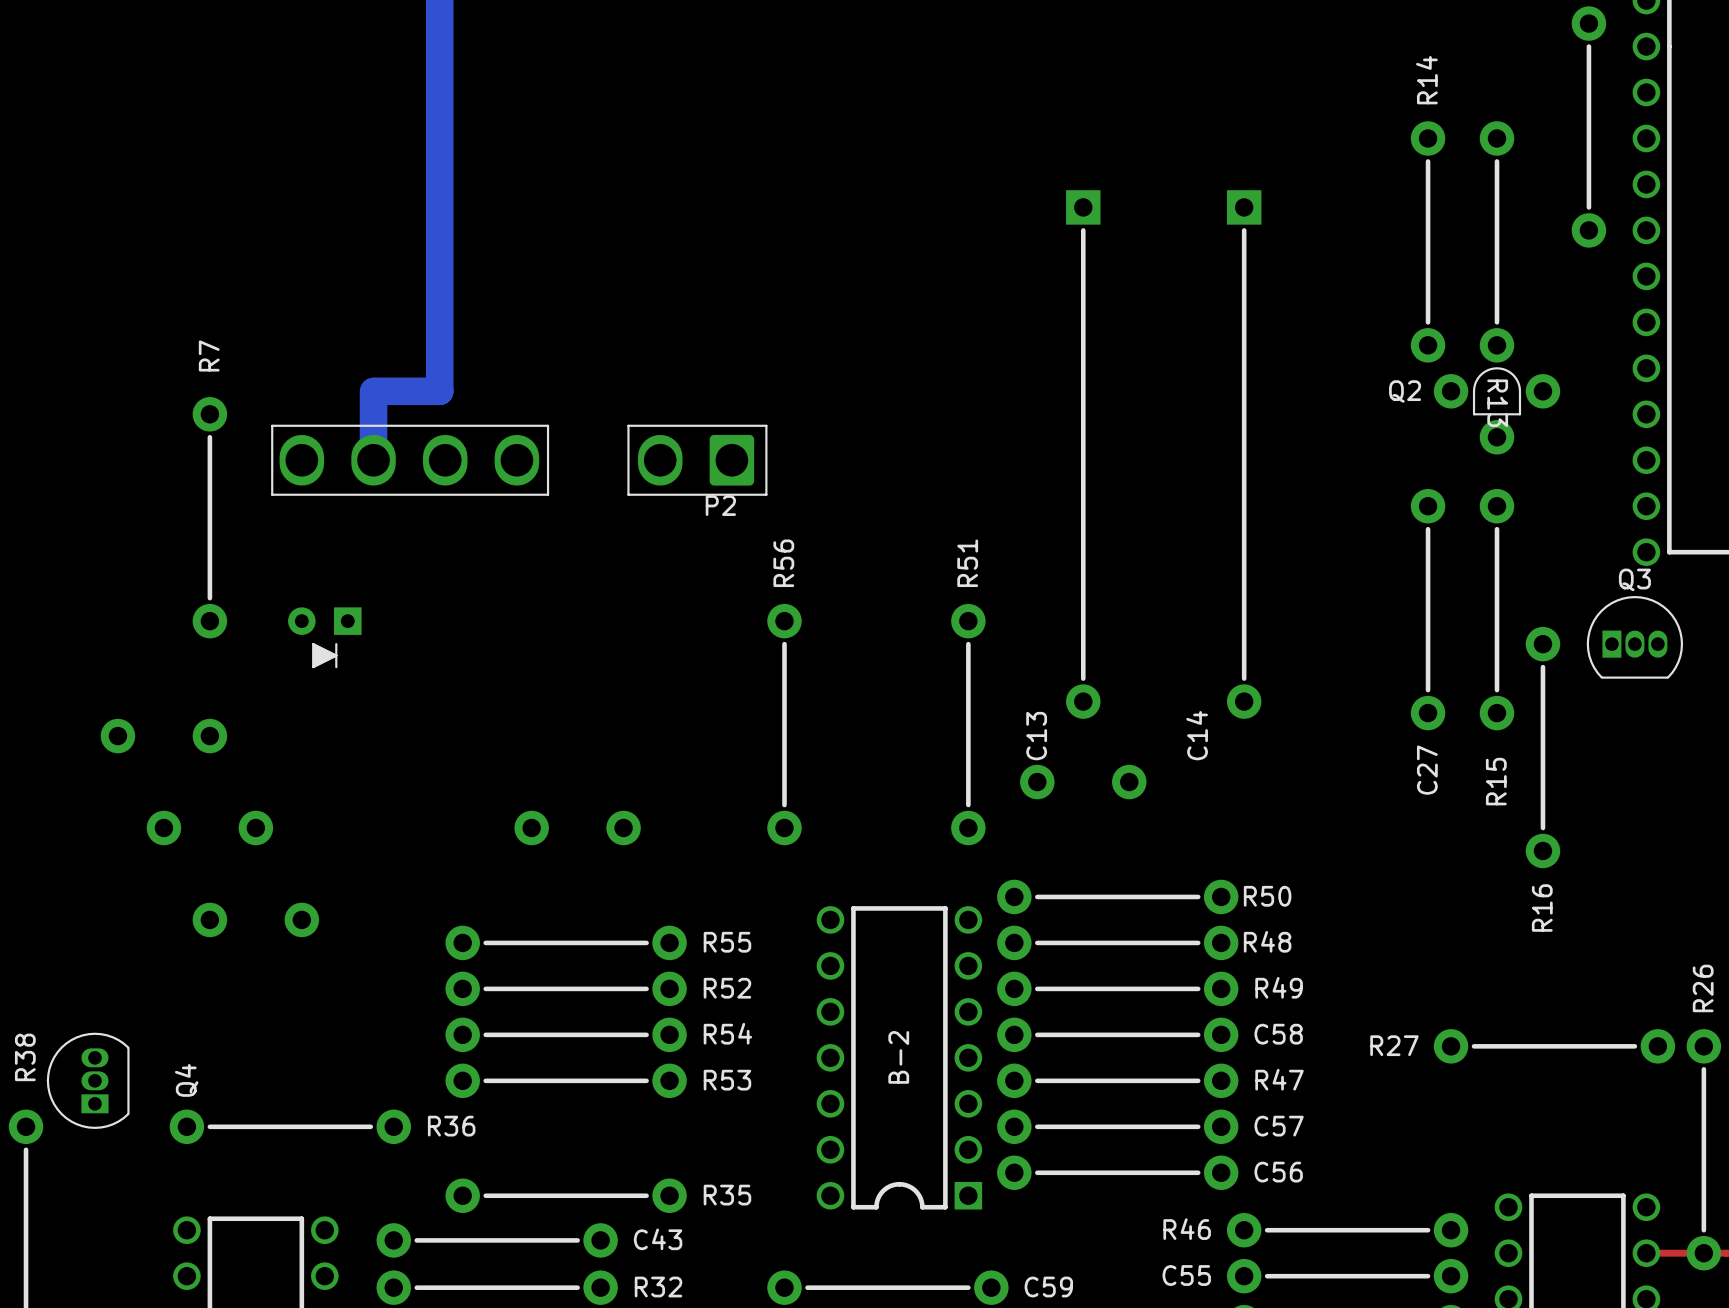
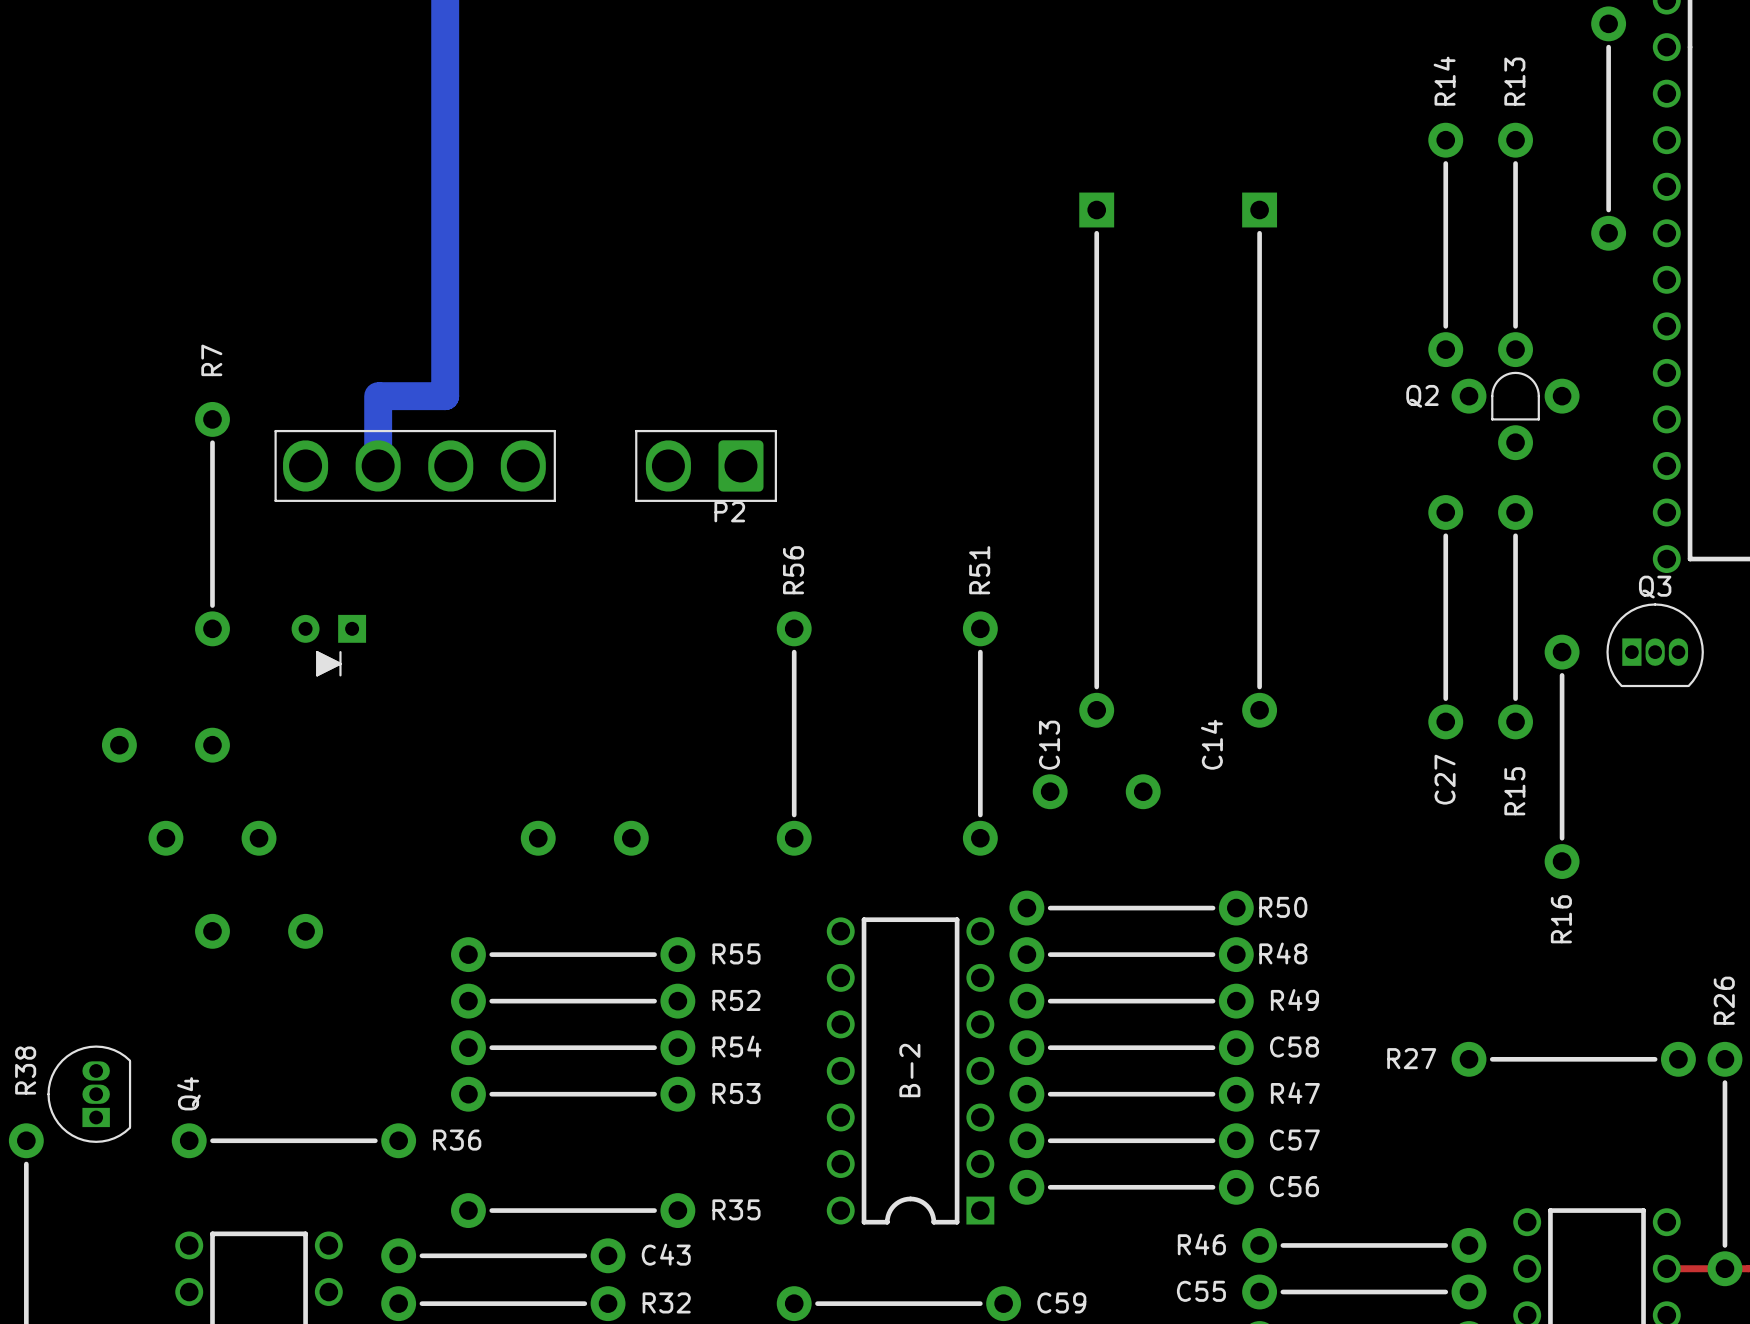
R13 name rotation: 0° (1497, 403) -> 180° (1514, 81)
R13 name position: R13 (1497, 403) -> R13 (1514, 81)

